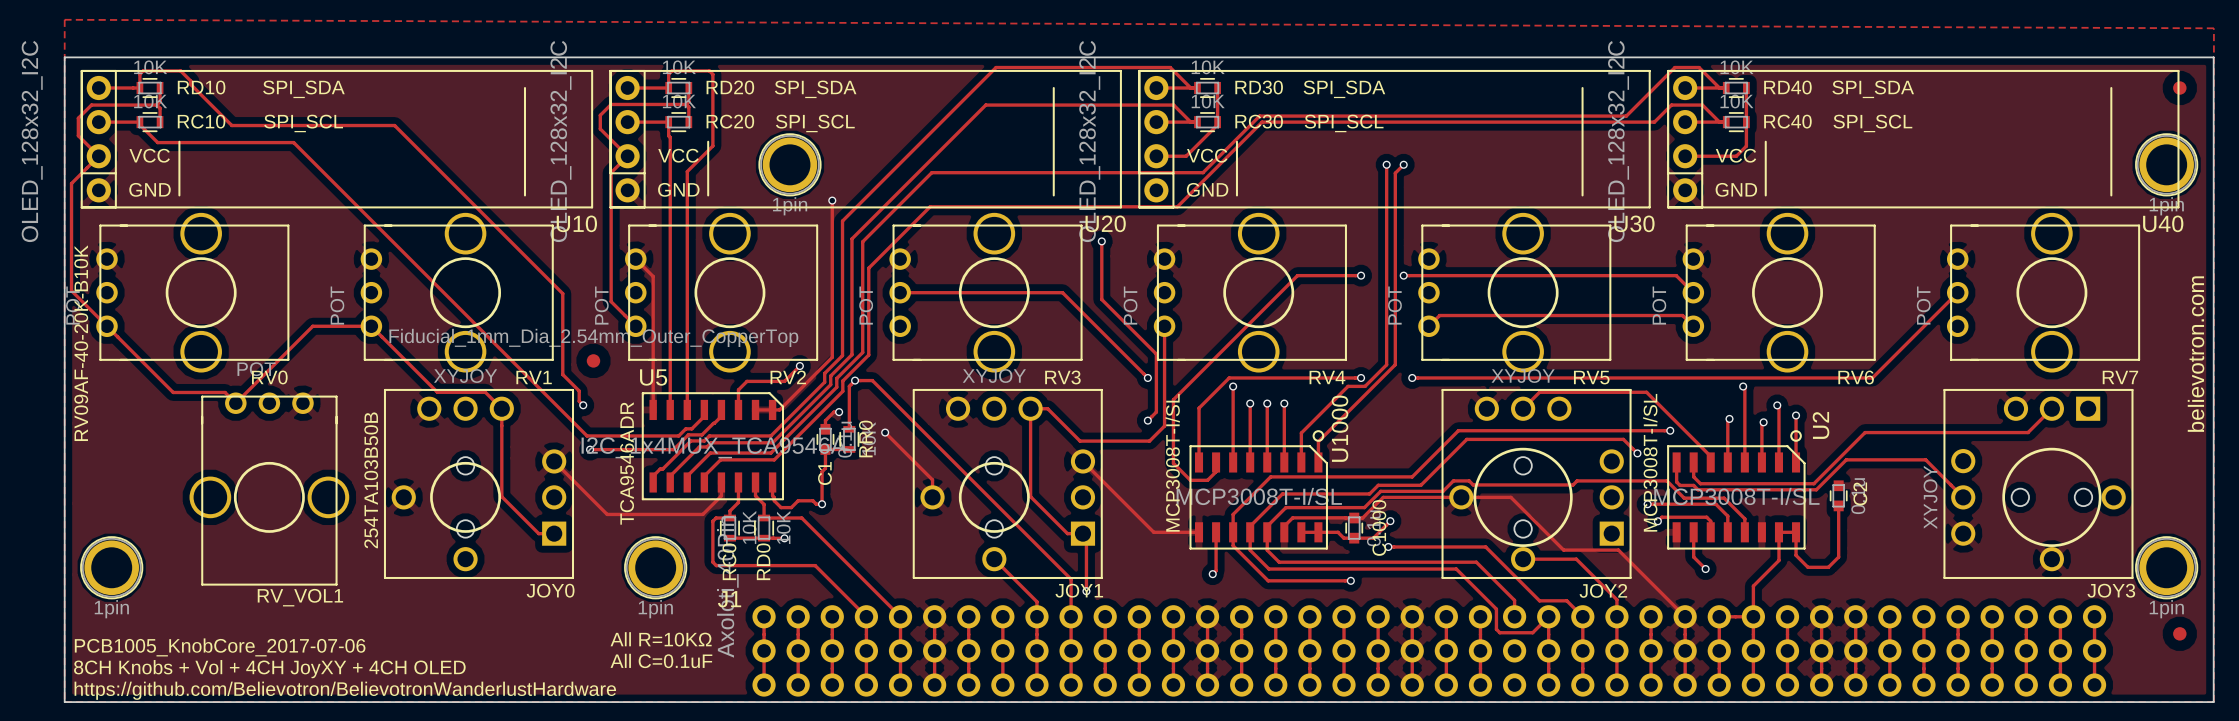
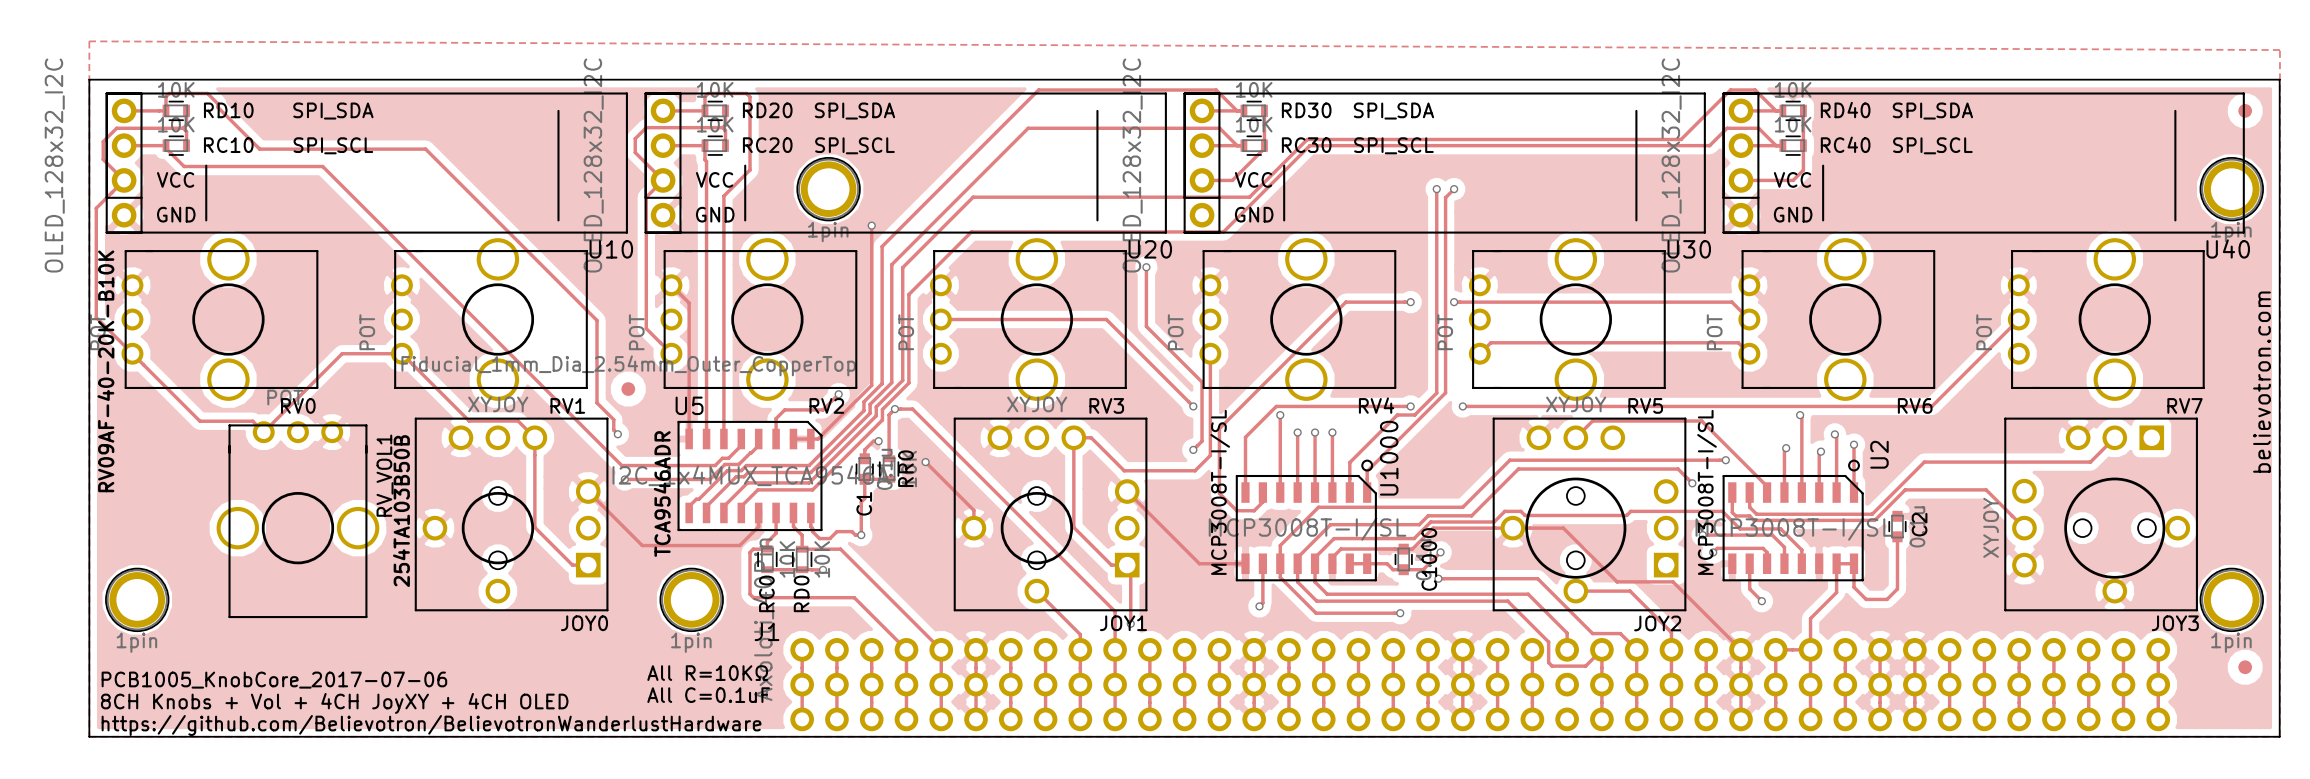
RV_VOL1 name rotation: 0° (300, 597) -> 90° counterclockwise (385, 475)
RV_VOL1 name position: RV_VOL1 (300, 597) -> RV_VOL1 (385, 475)

